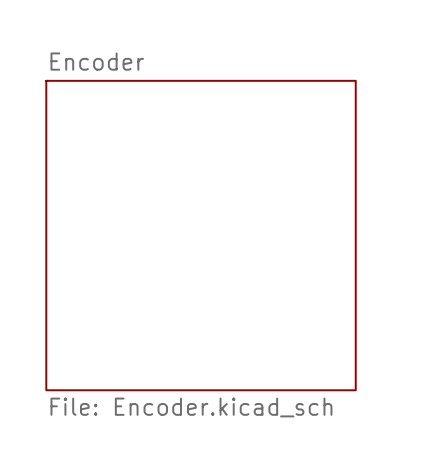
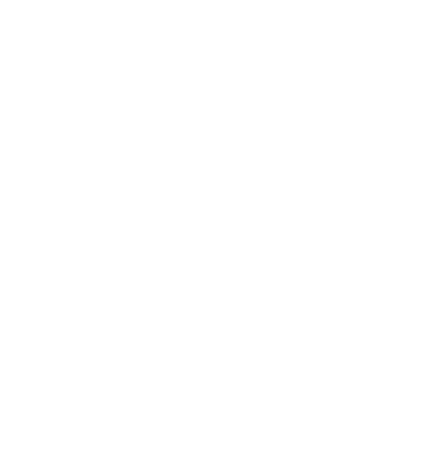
sheet Encoder: File: Encoder.kicad_sch (201, 235) -> none

